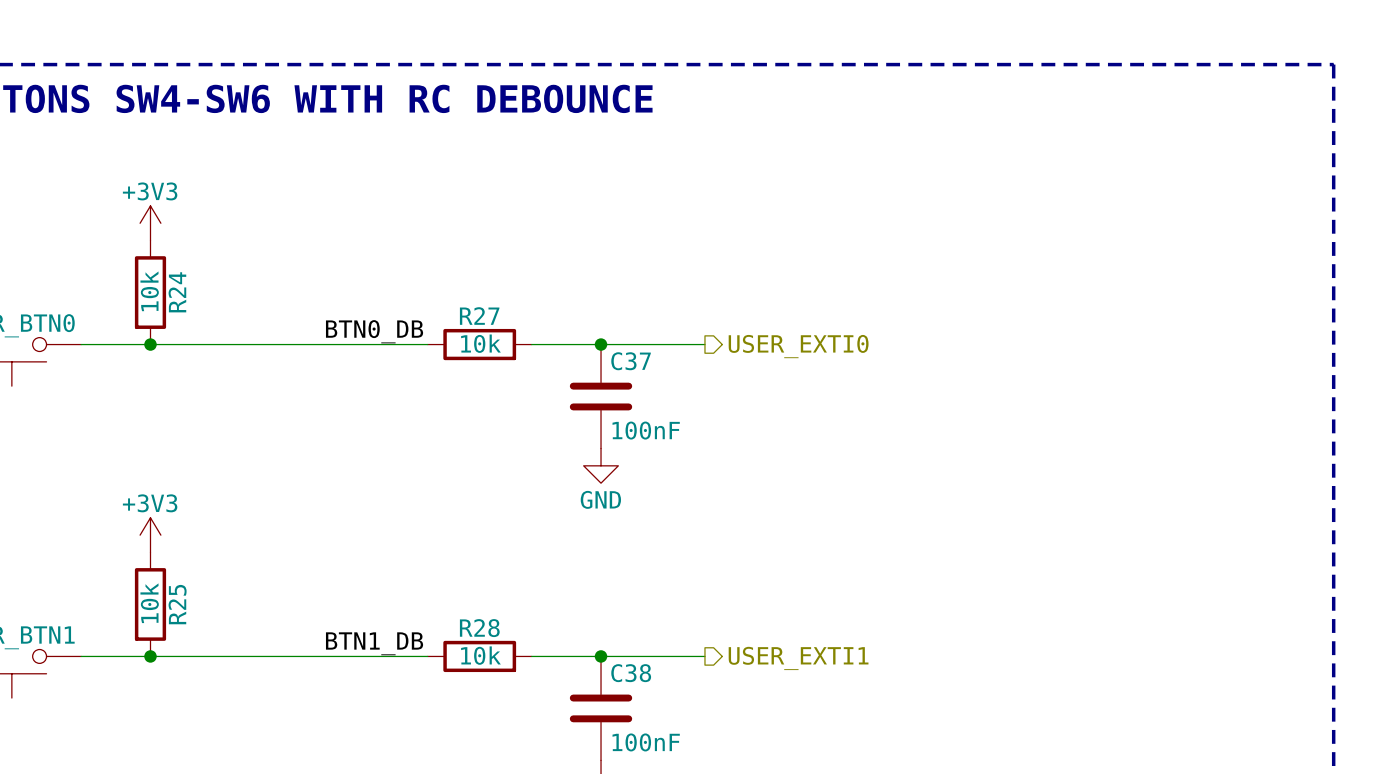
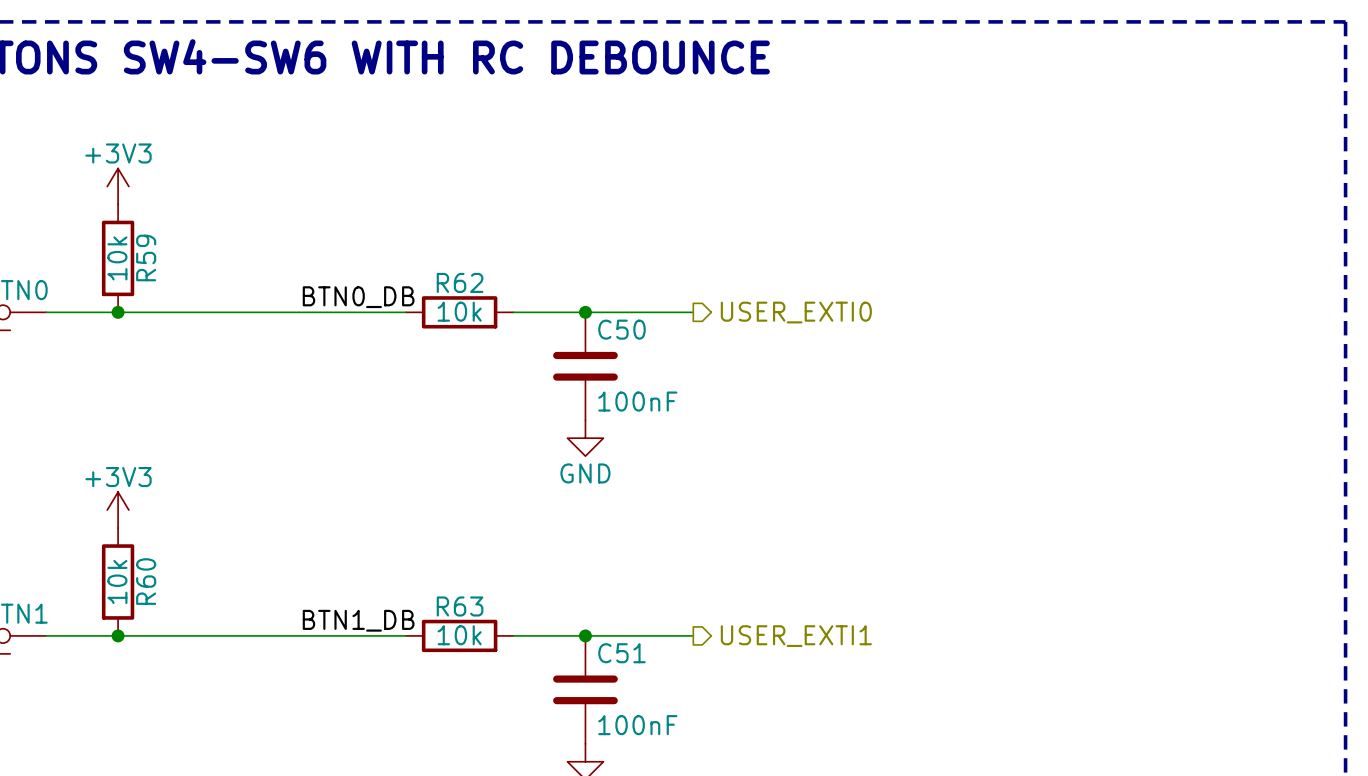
R24 name: R24 (177, 292) -> R59 (146, 257)
R27 name: R27 (479, 316) -> R62 (460, 282)
C37 name: C37 (631, 361) -> C50 (621, 329)
R25 name: R25 (177, 604) -> R60 (146, 581)
R28 name: R28 (479, 628) -> R63 (460, 606)
C38 name: C38 (631, 673) -> C51 (621, 653)

